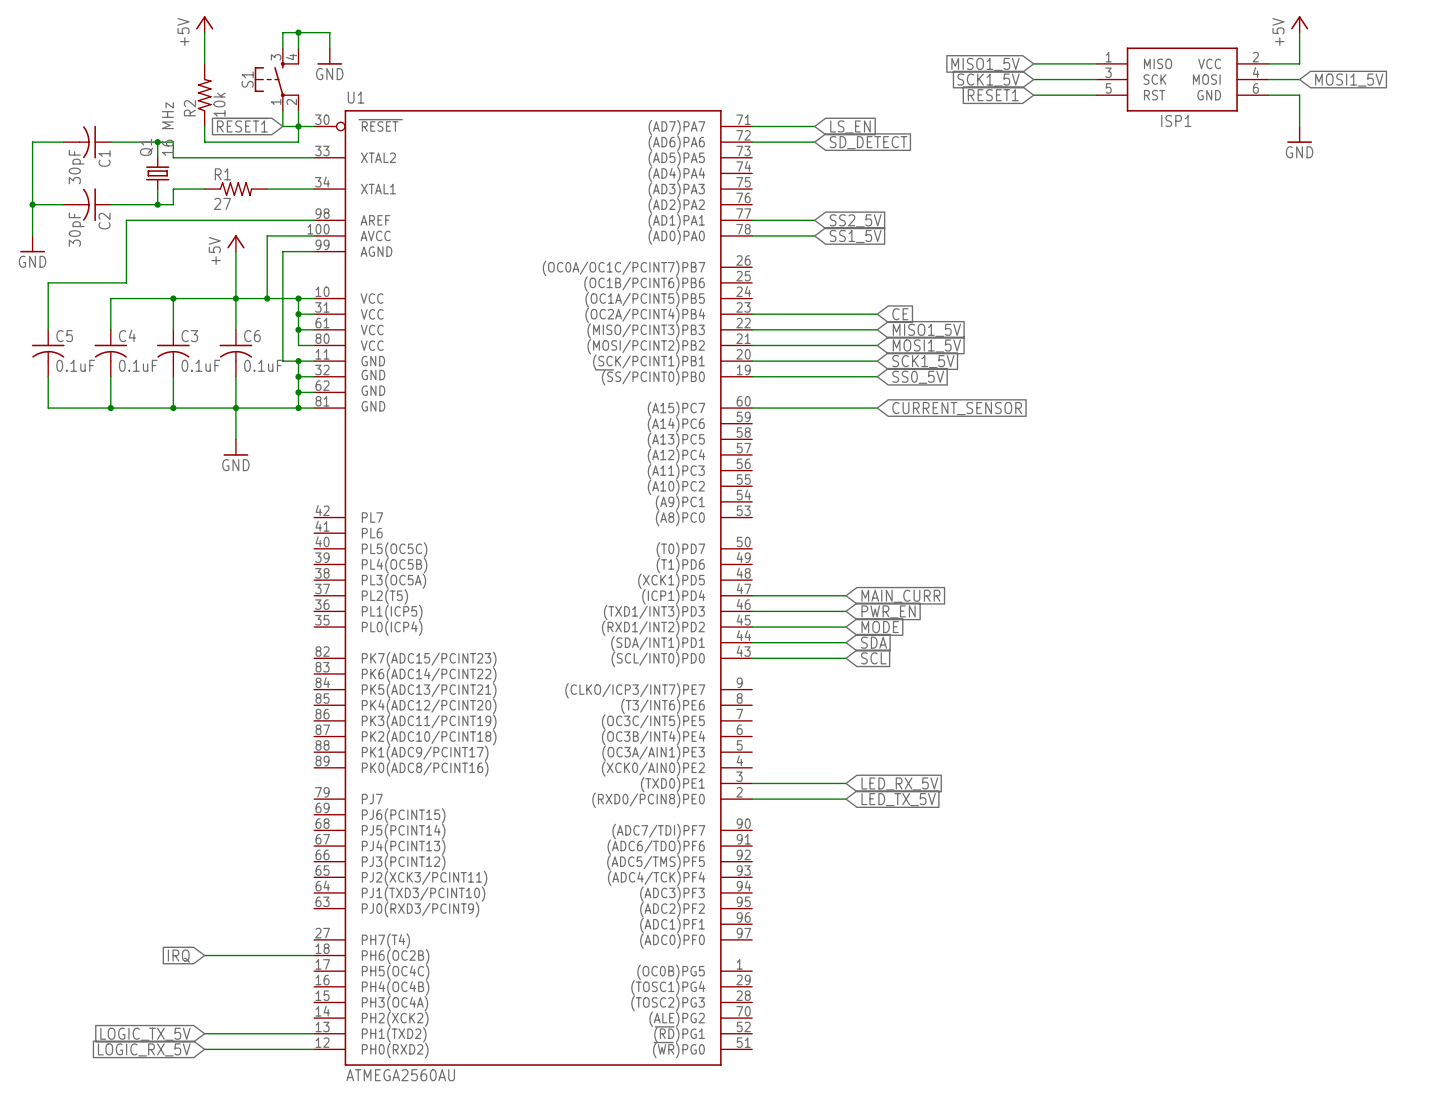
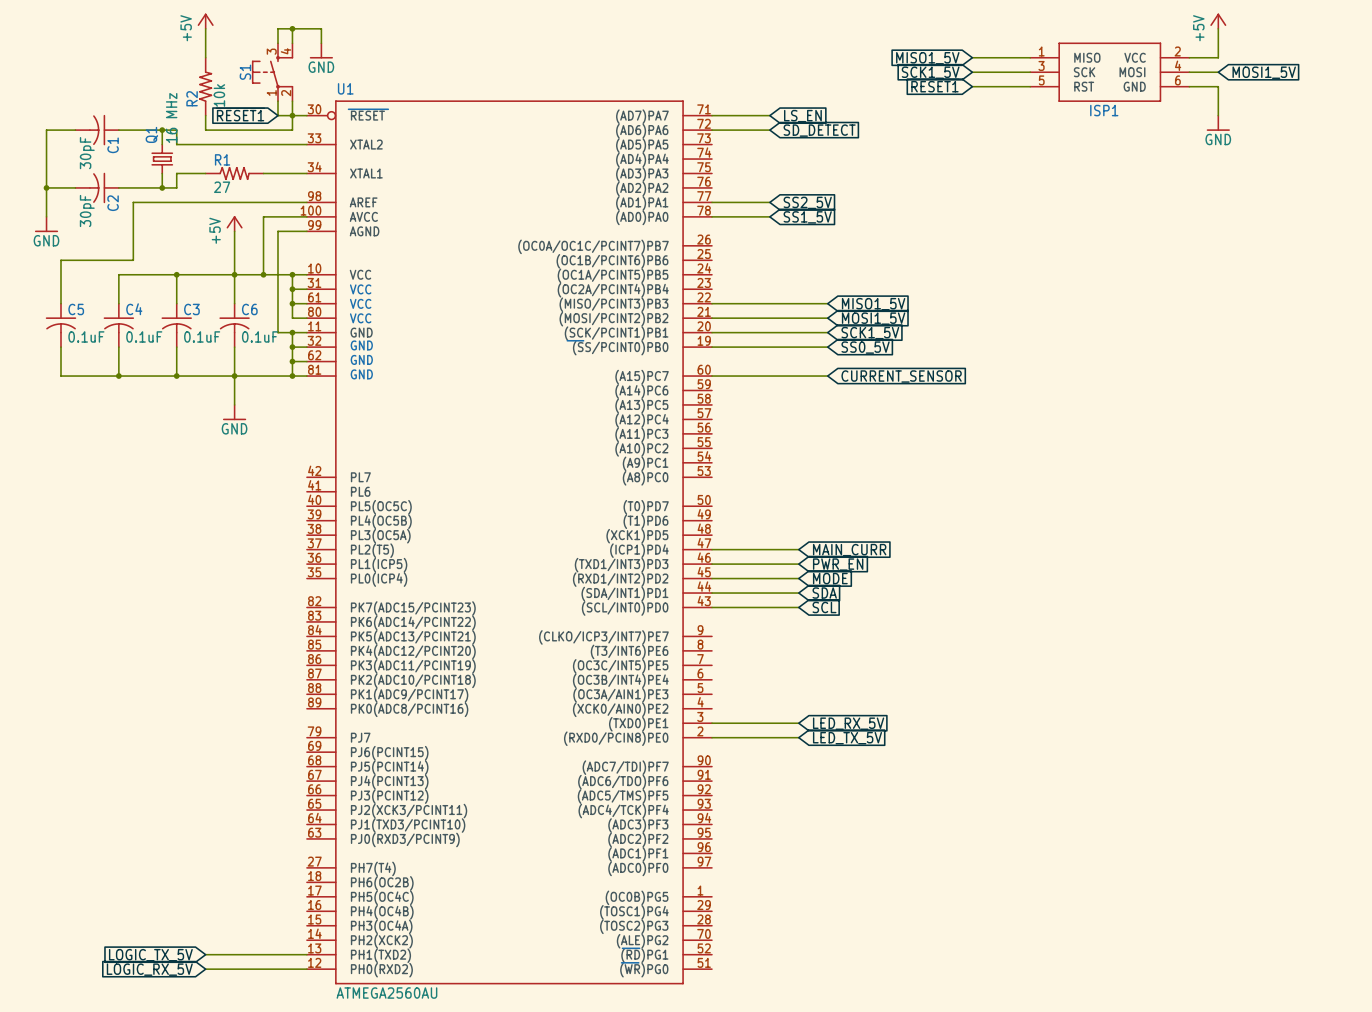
wire: (752, 314) (877, 314) -> none
global label: CE (900, 314) -> none
wire: (204, 955) (314, 955) -> none
global label: IRQ (178, 956) -> none

